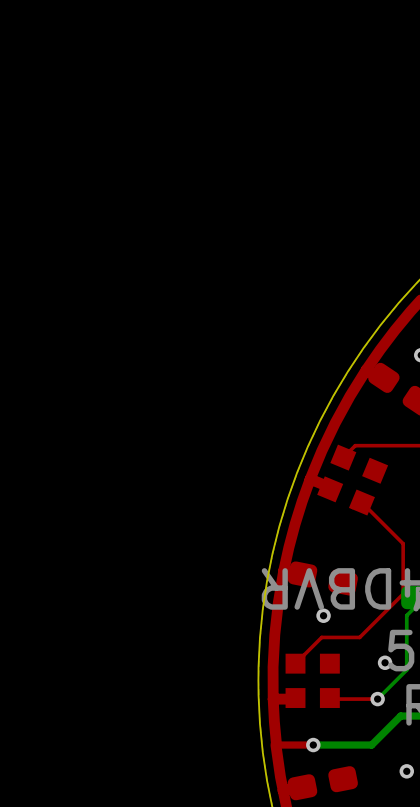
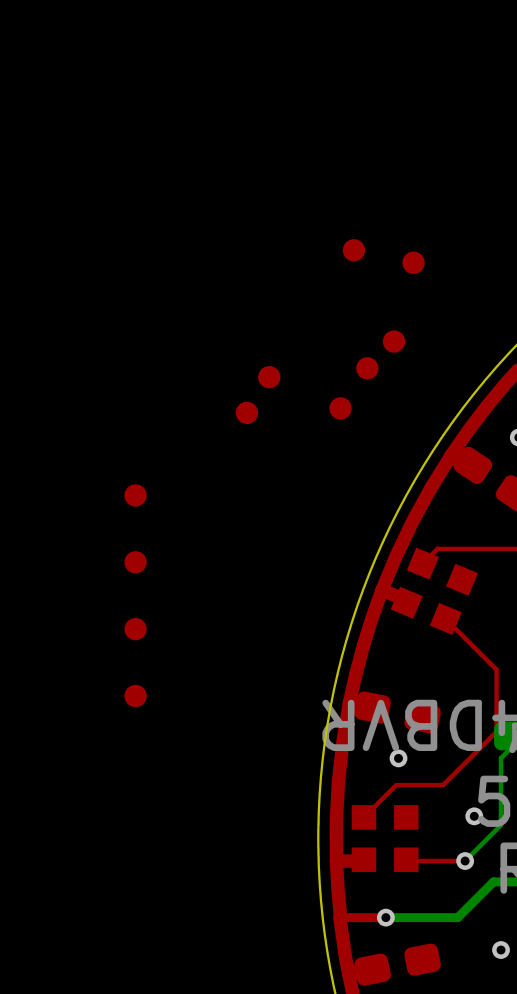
part: none -> (353, 250)
part: none -> (413, 262)
part: none -> (394, 341)
part: none -> (367, 368)
part: none -> (269, 377)
part: none -> (340, 408)
part: none -> (246, 412)
part: none -> (135, 495)
part: none -> (135, 562)
part: none -> (135, 629)
part: none -> (135, 695)

